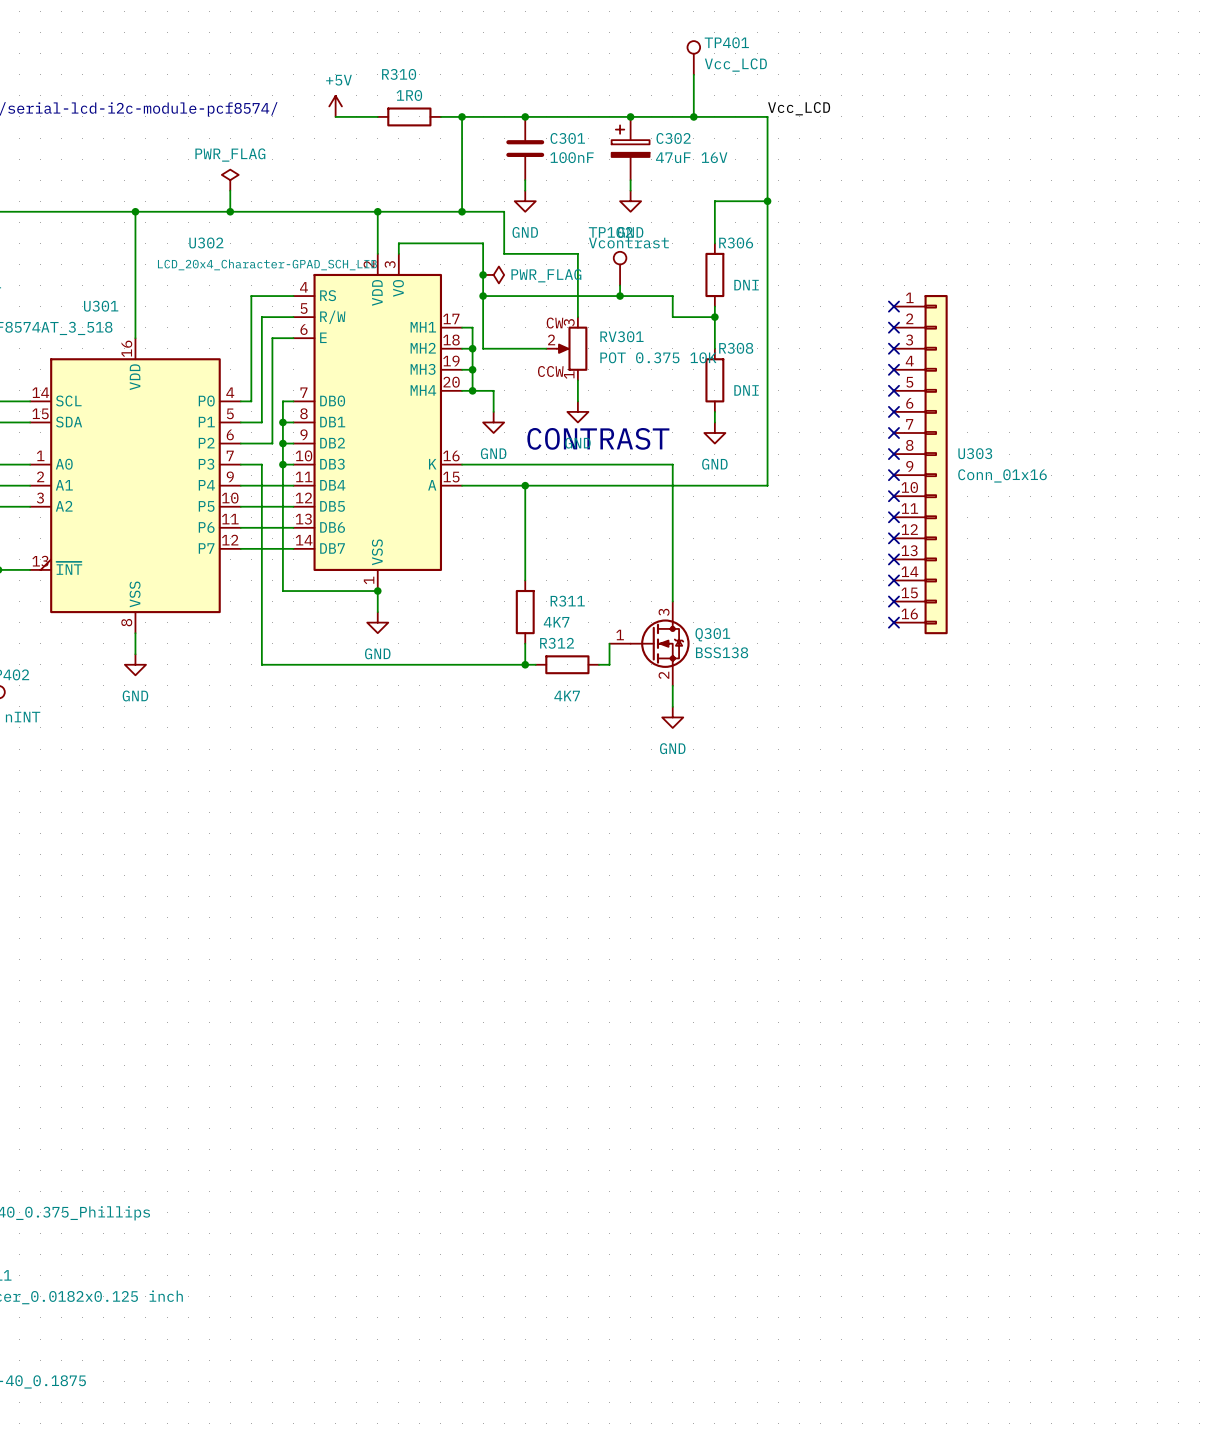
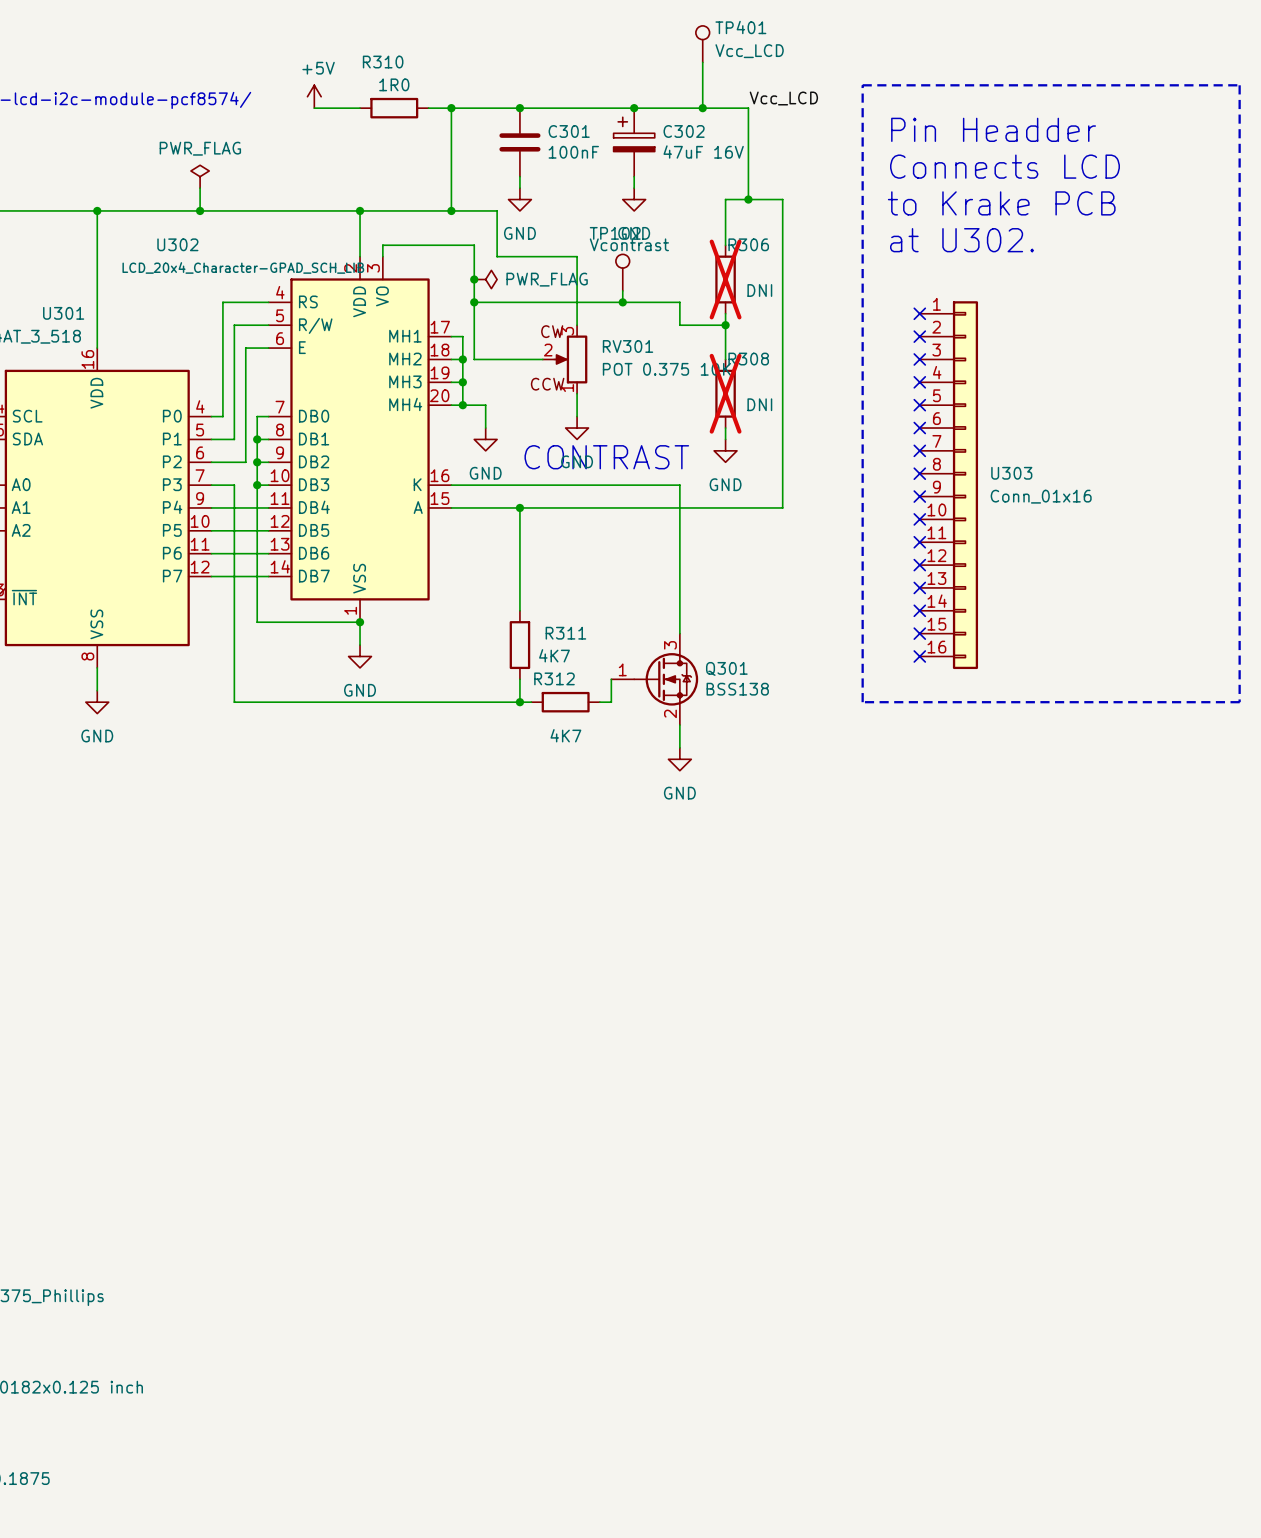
line: none -> (862, 85) (1239, 85) (1239, 702) (862, 702) (862, 85)
label position: Vcc_LCD (799, 108) -> Vcc_LCD (783, 98)
wire: (735, 116) (767, 116) (767, 201) -> (748, 108) (748, 199)
text: none -> Pin Headder (993, 129)
text: none -> Connects LCD (1004, 166)
junction position: (767, 201) -> (748, 199)
text: none -> to Krake PCB (1001, 203)
text: none -> at U302. (962, 240)
R306 do-not-place cross: none -> (725, 279)
R308 do-not-place cross: none -> (725, 393)

